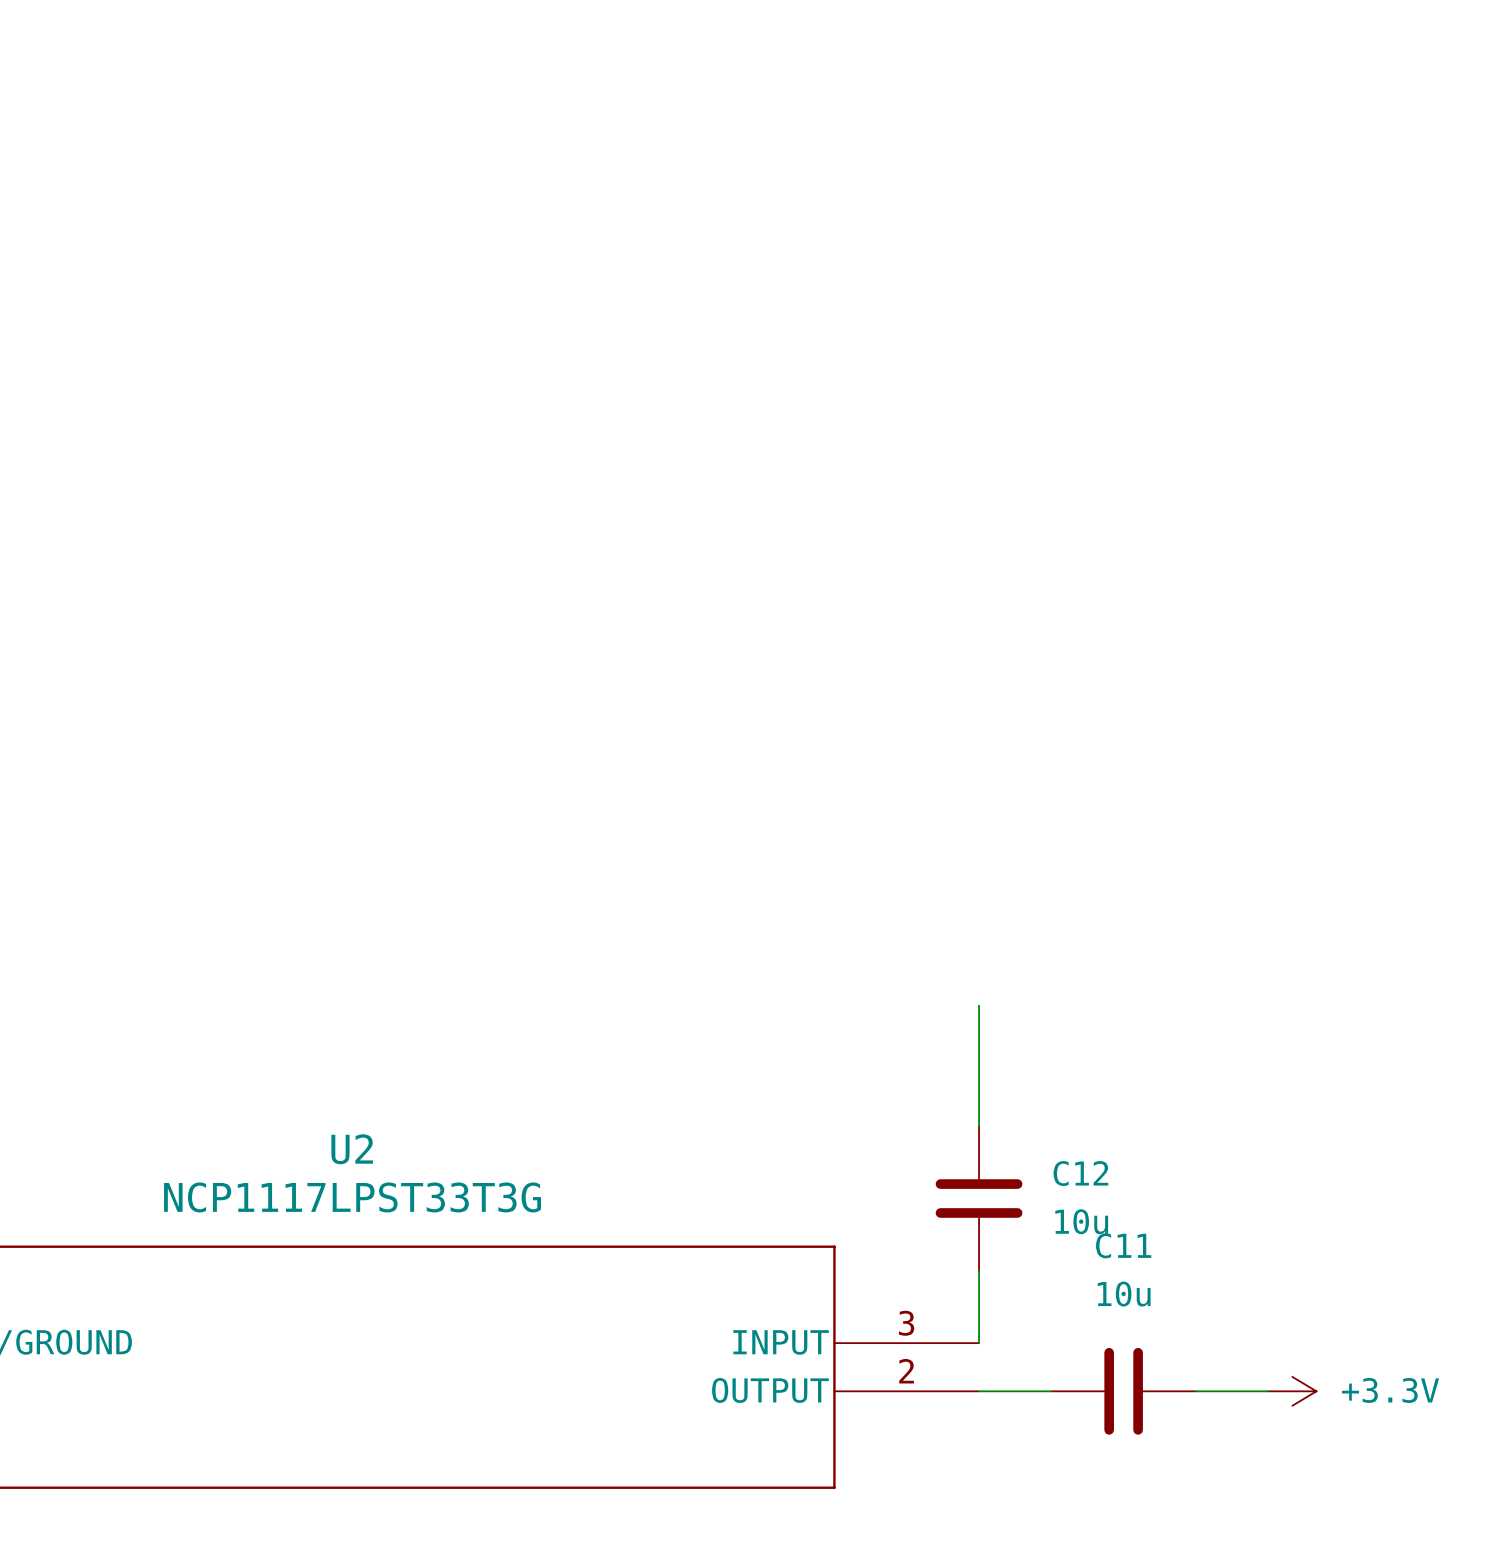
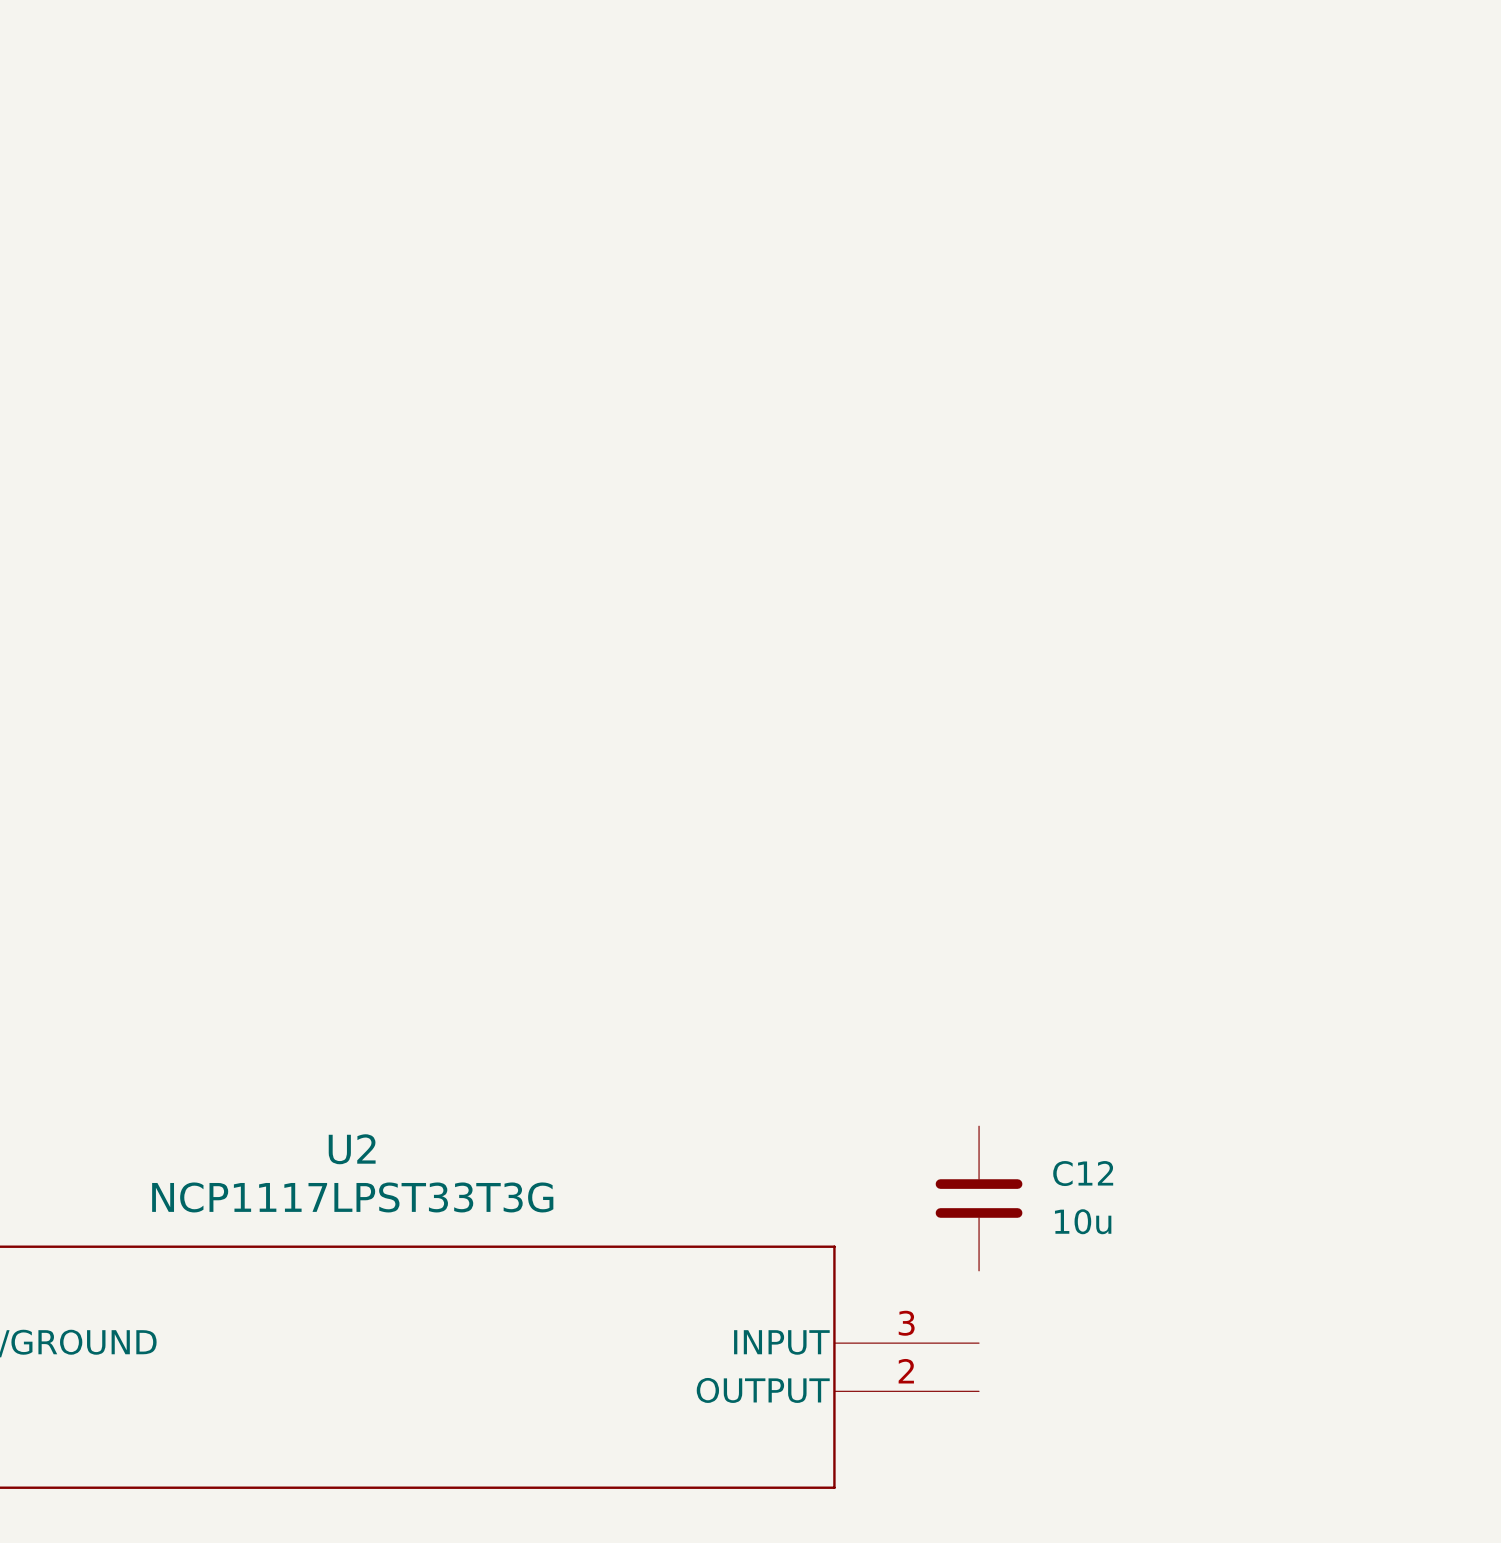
wire: (979, 1005) (979, 1126) -> none
wire: (979, 1270) (979, 1343) -> none
wire: (979, 1391) (1051, 1391) -> none
C11: 10u (1123, 1391) -> none
wire: (1195, 1391) (1268, 1391) -> none
power symbol: +3.3V (1292, 1391) -> none

